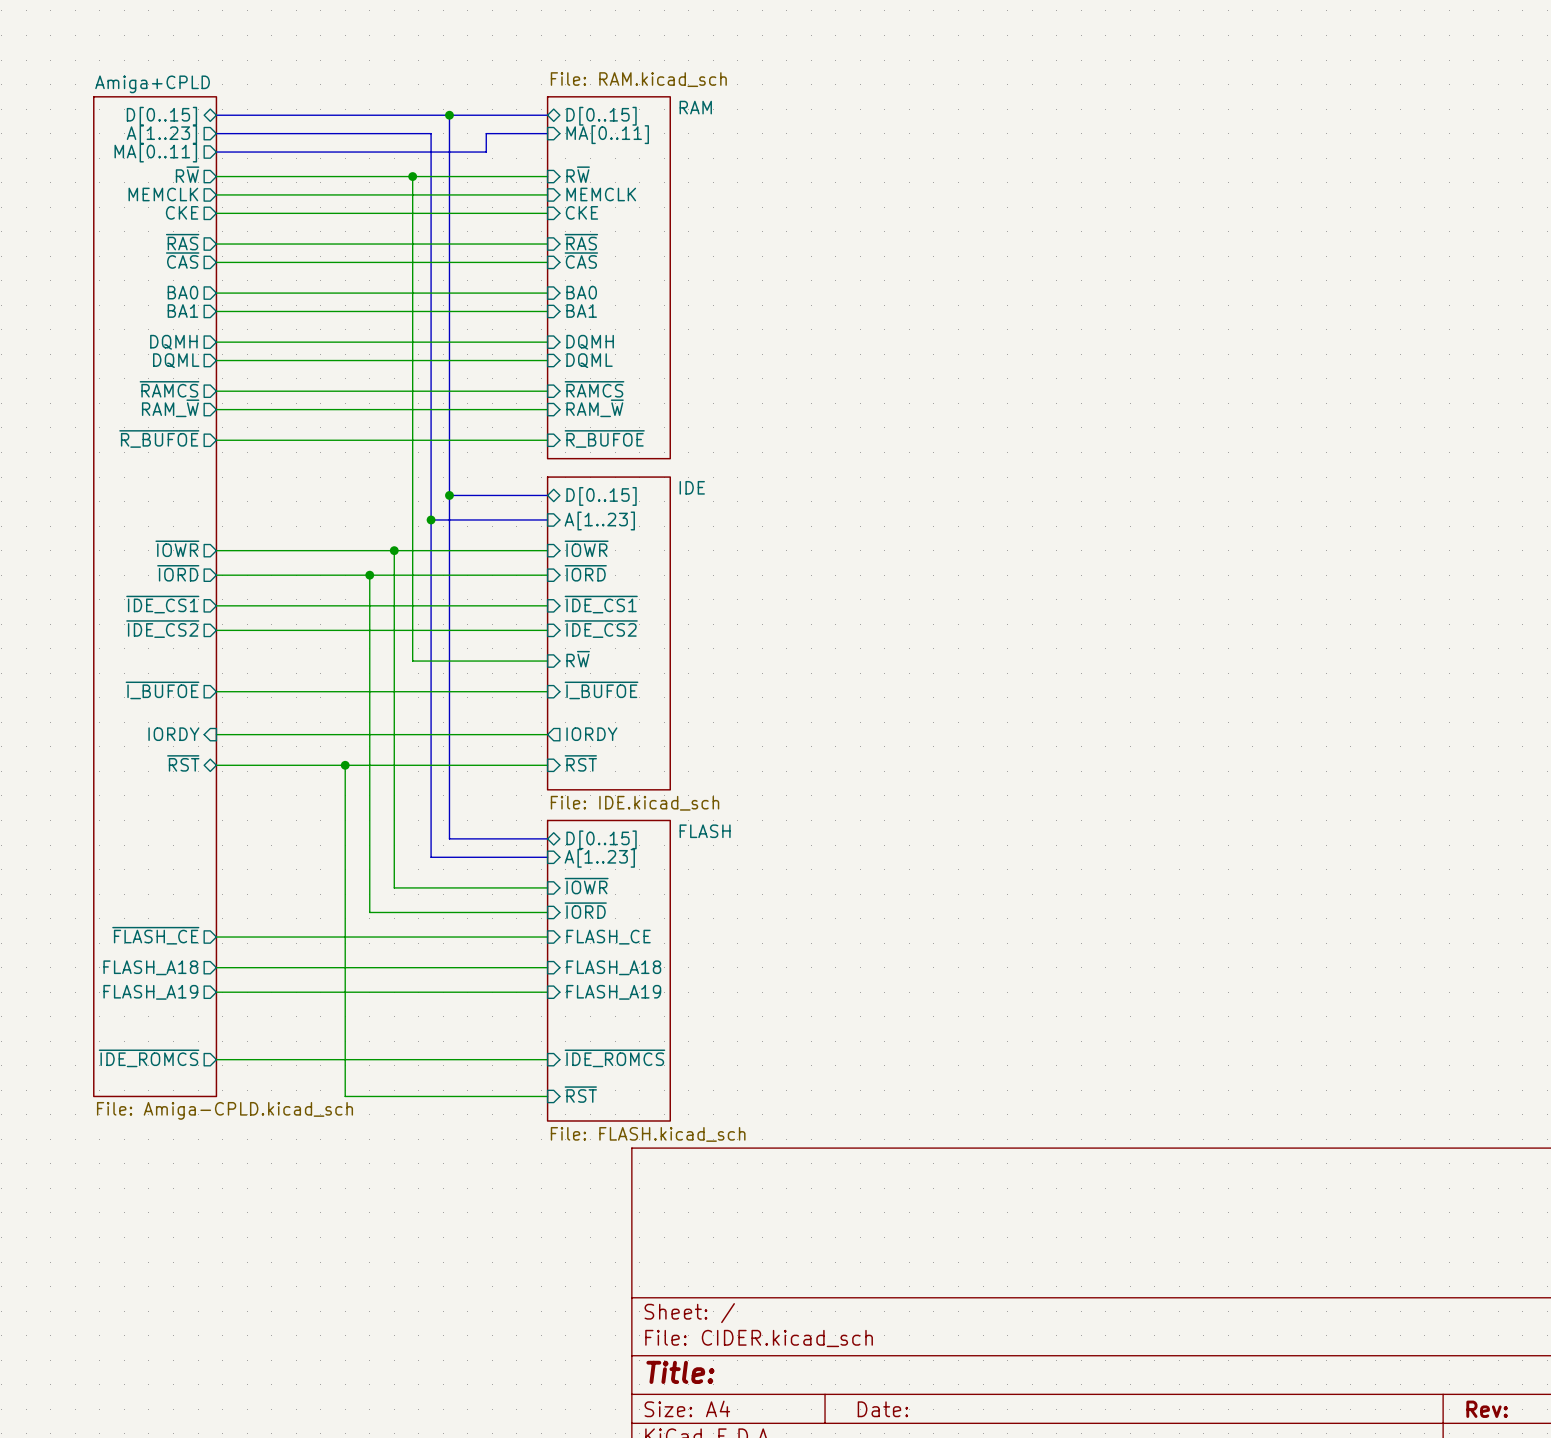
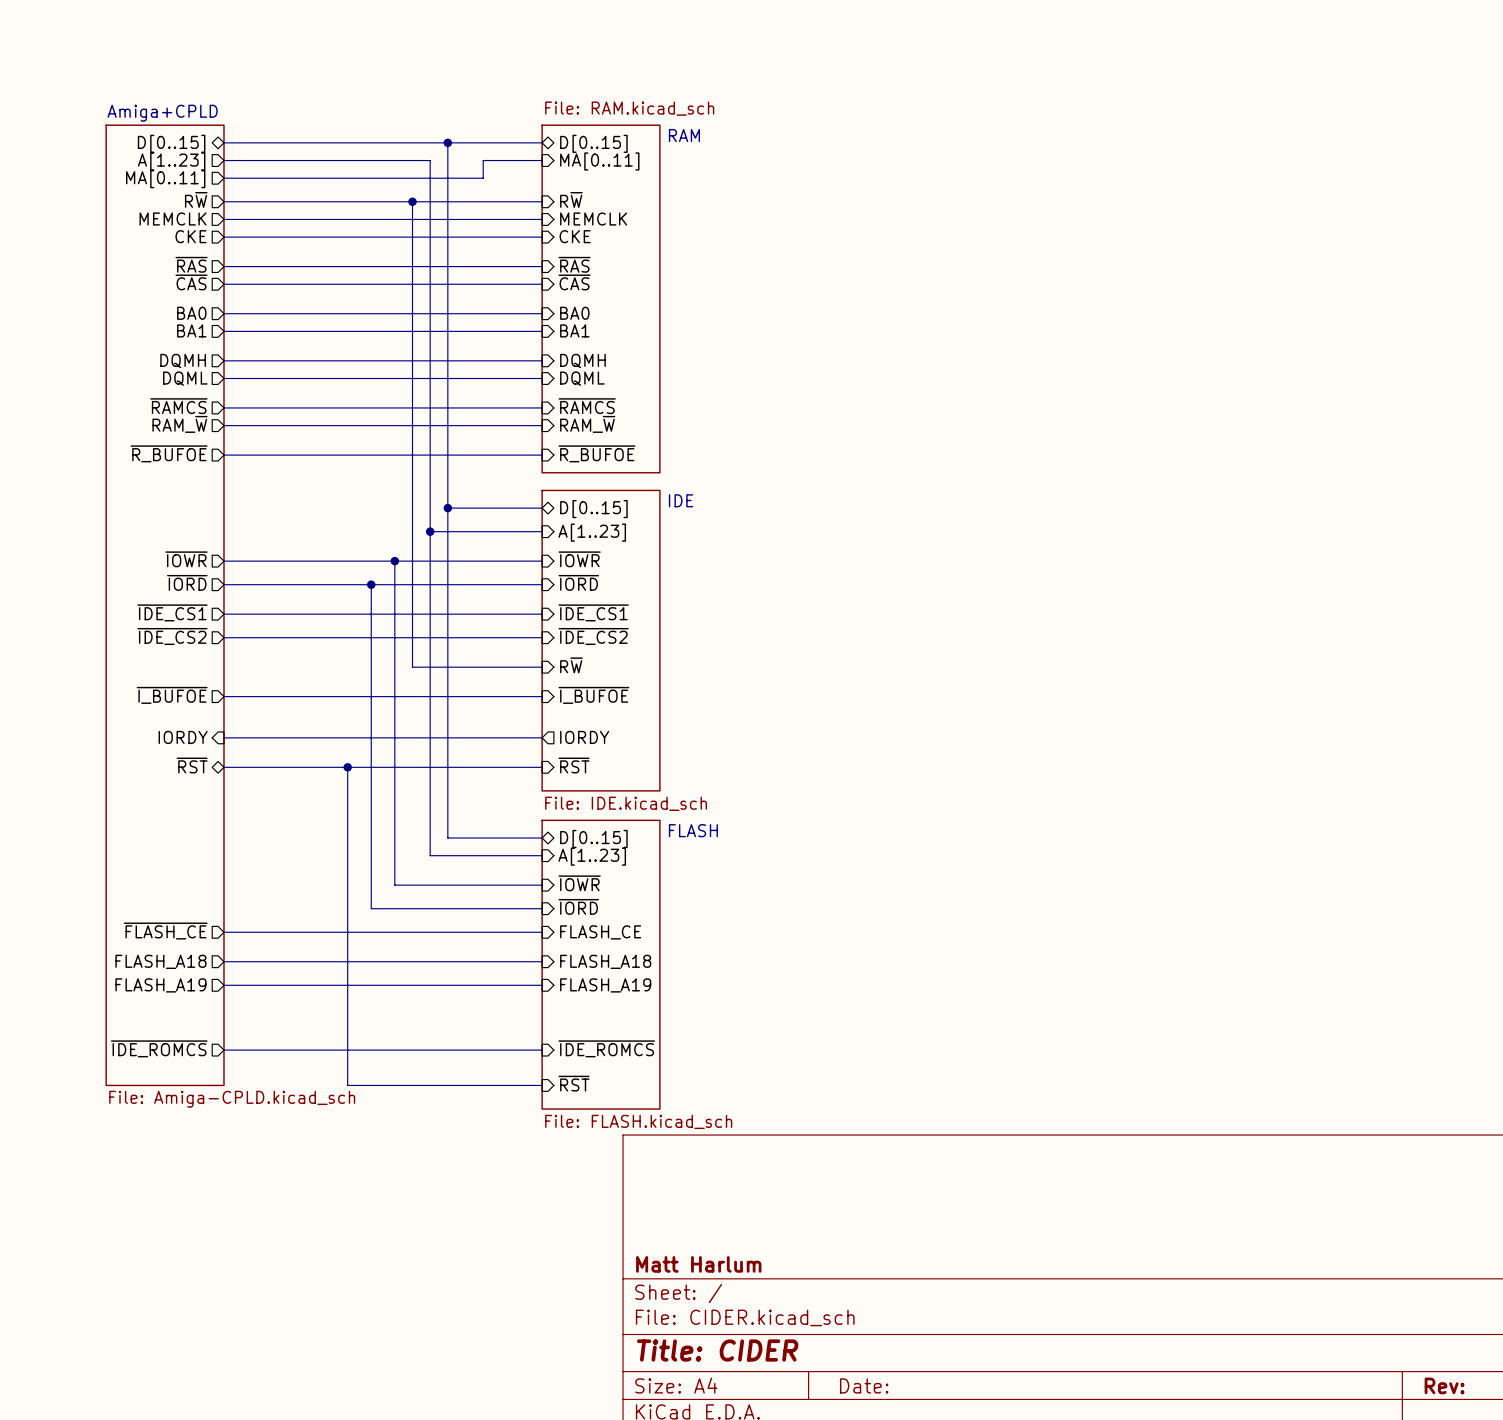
title block: none -> Matt Harlum (698, 1264)
title block: Title: (680, 1372) -> Title: CIDER (717, 1350)

